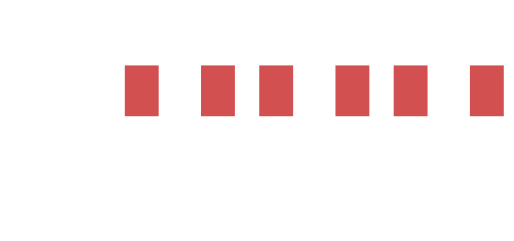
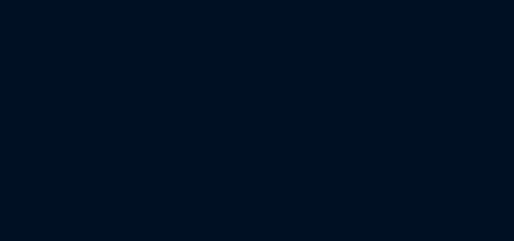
part: (179, 90) -> none
part: (314, 90) -> none
part: (448, 90) -> none

